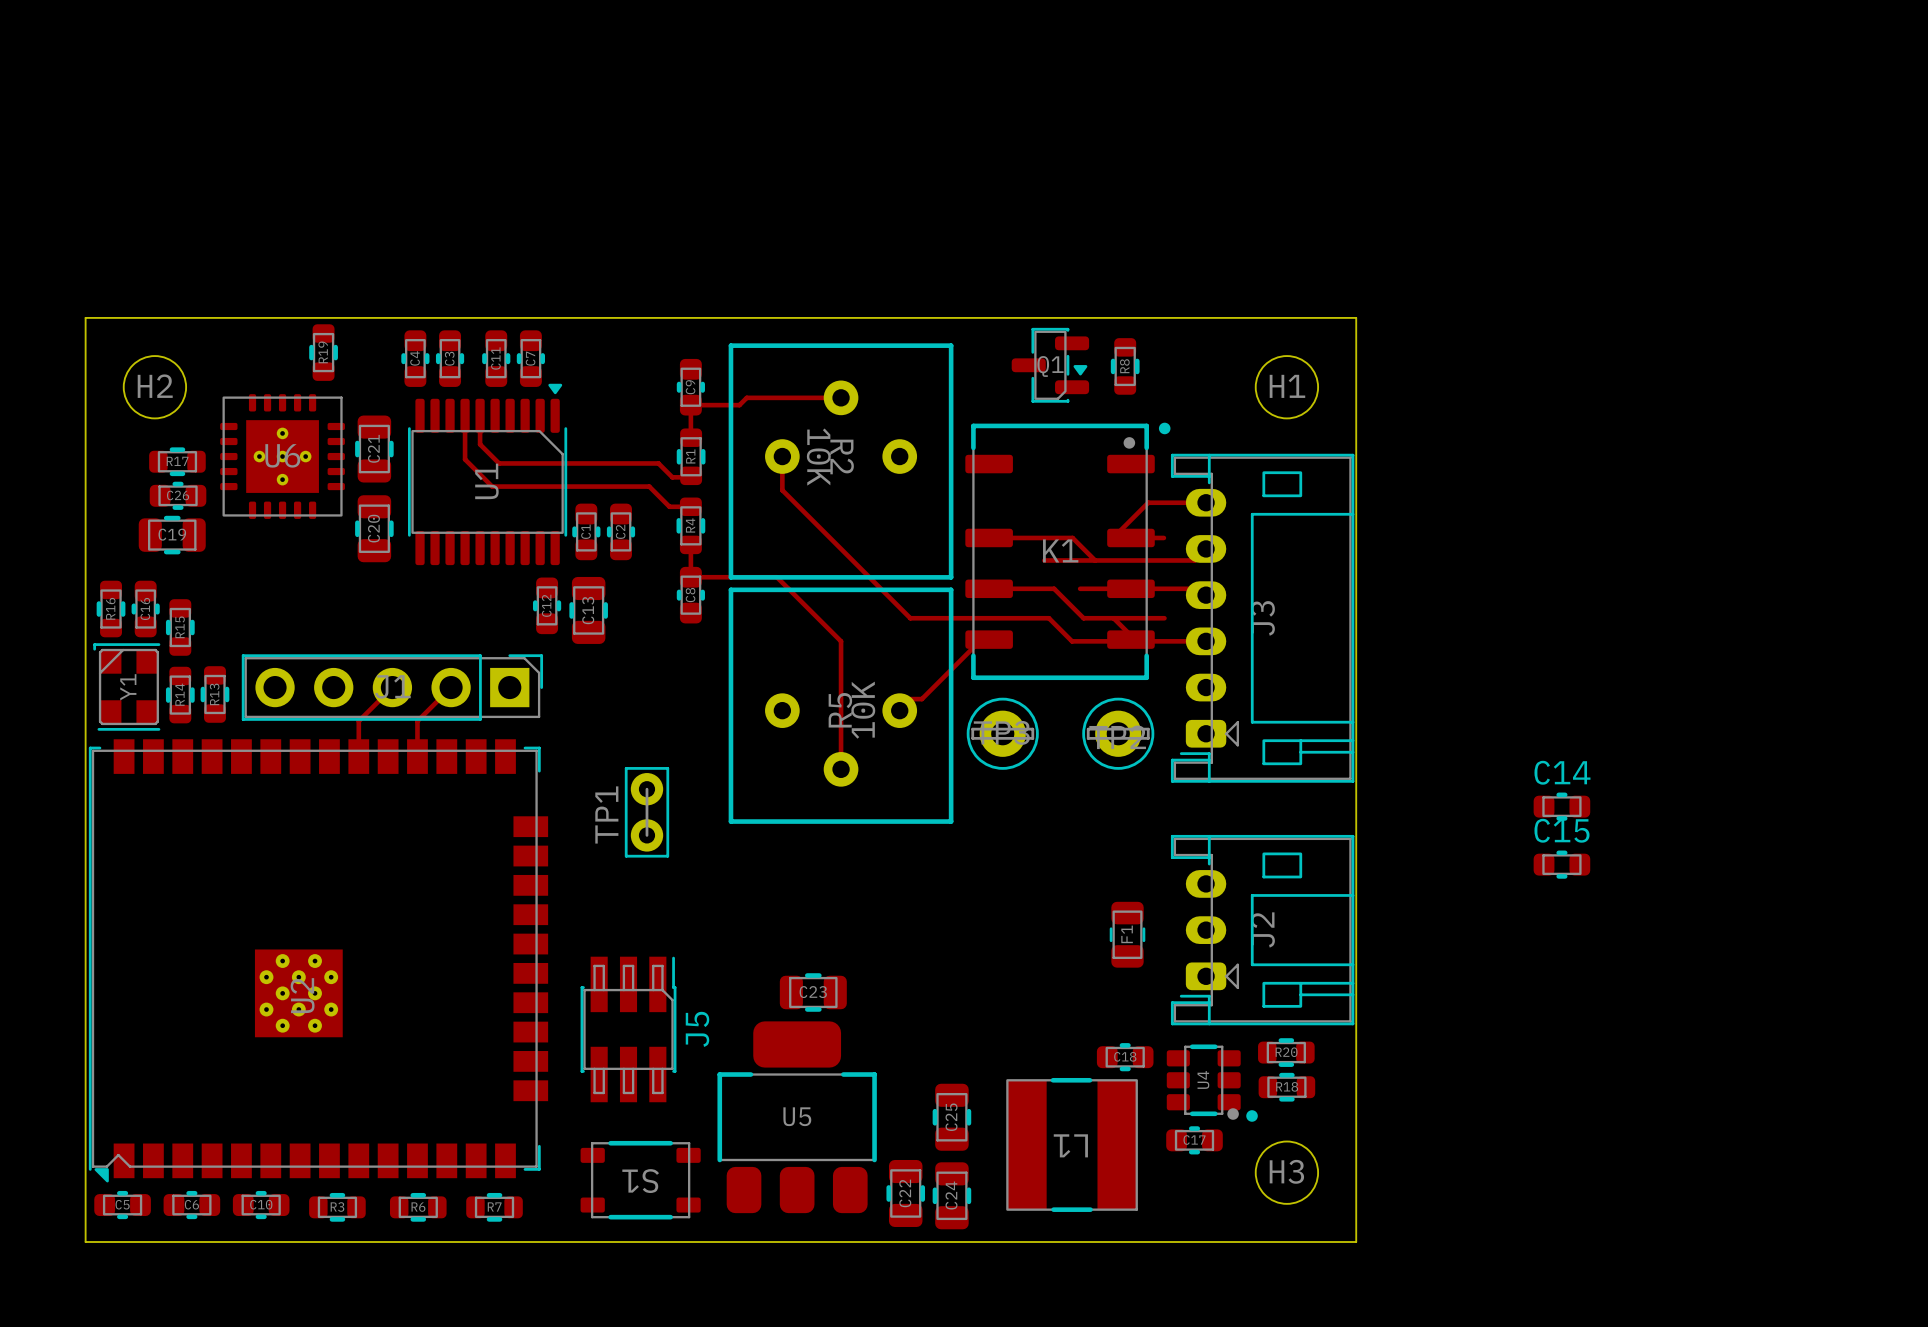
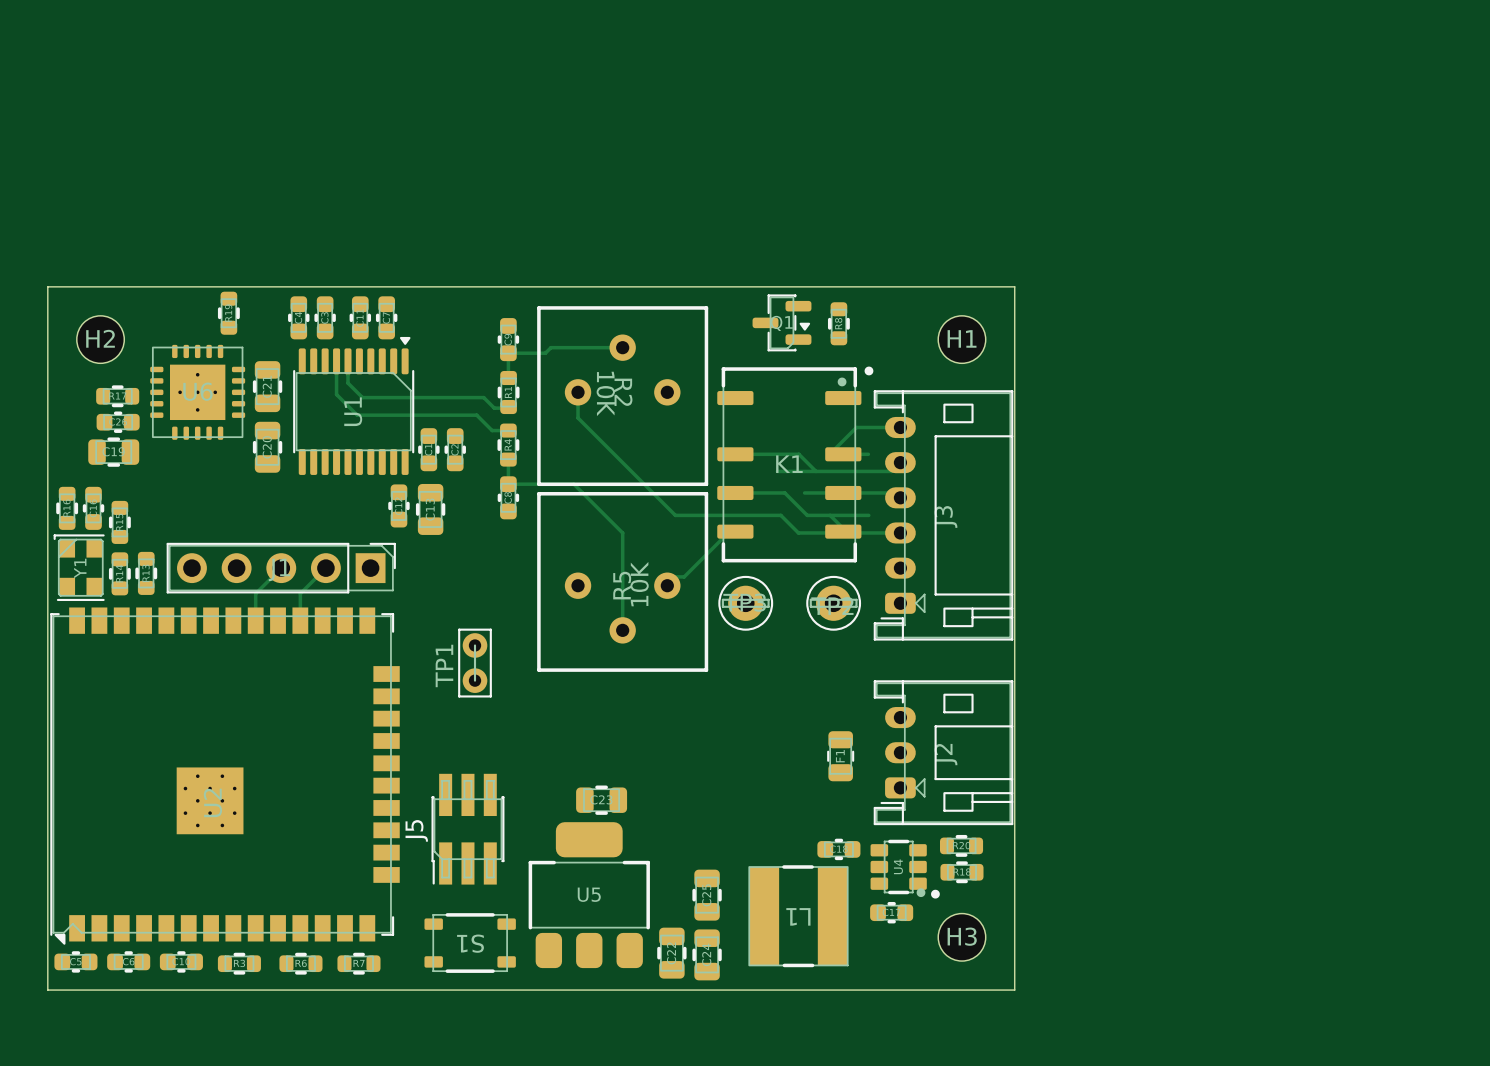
C14: (1561, 806) -> none
C15: (1561, 864) -> none
J5 rotation: 0° (628, 1029) -> 180° (467, 829)

